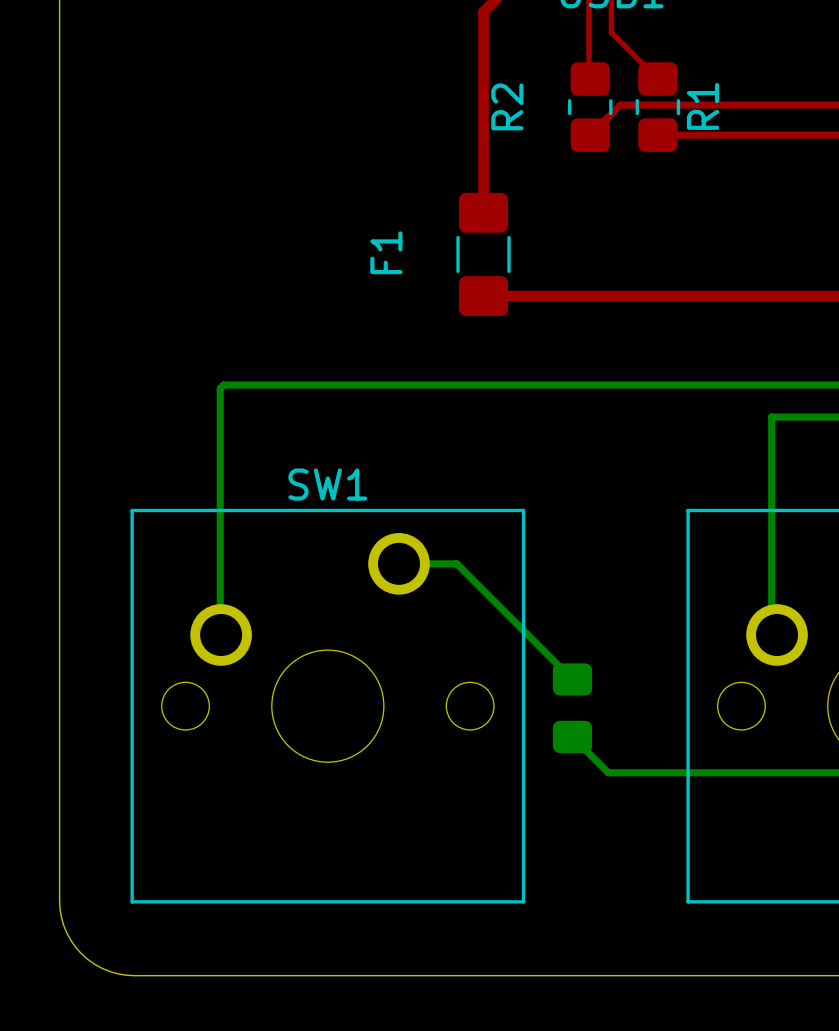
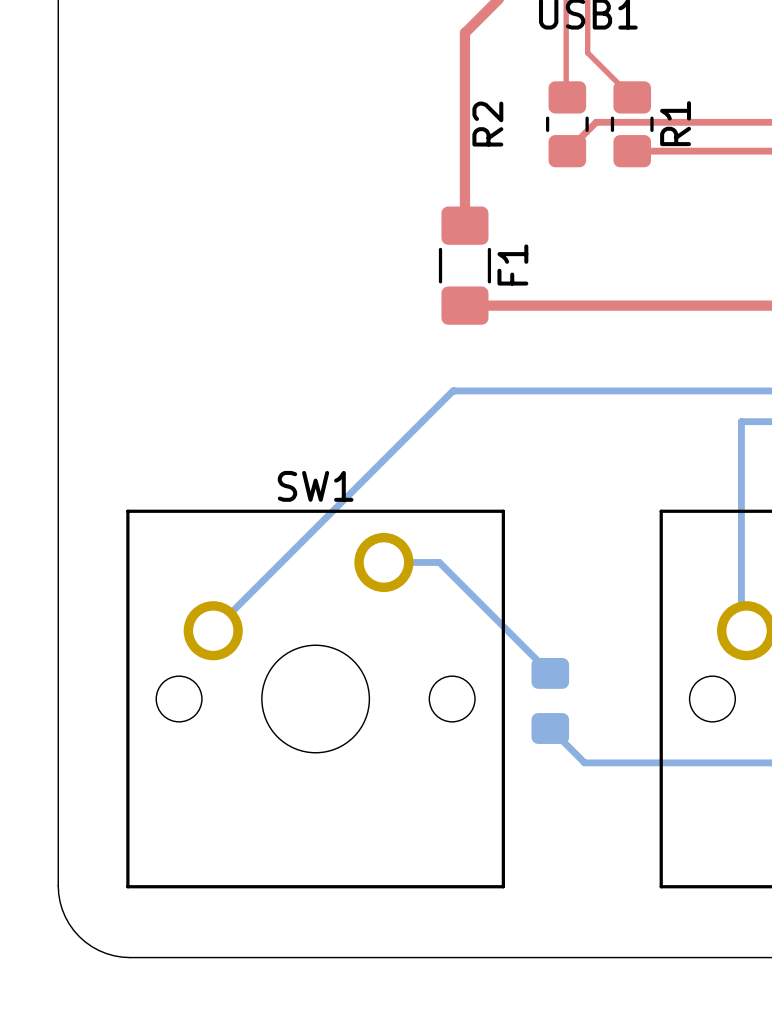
F1 name position: F1 (386, 252) -> F1 (512, 265)
bottom track: (471, 385) (223, 385) (220, 388) (221, 634) -> (453, 390) (213, 630)

